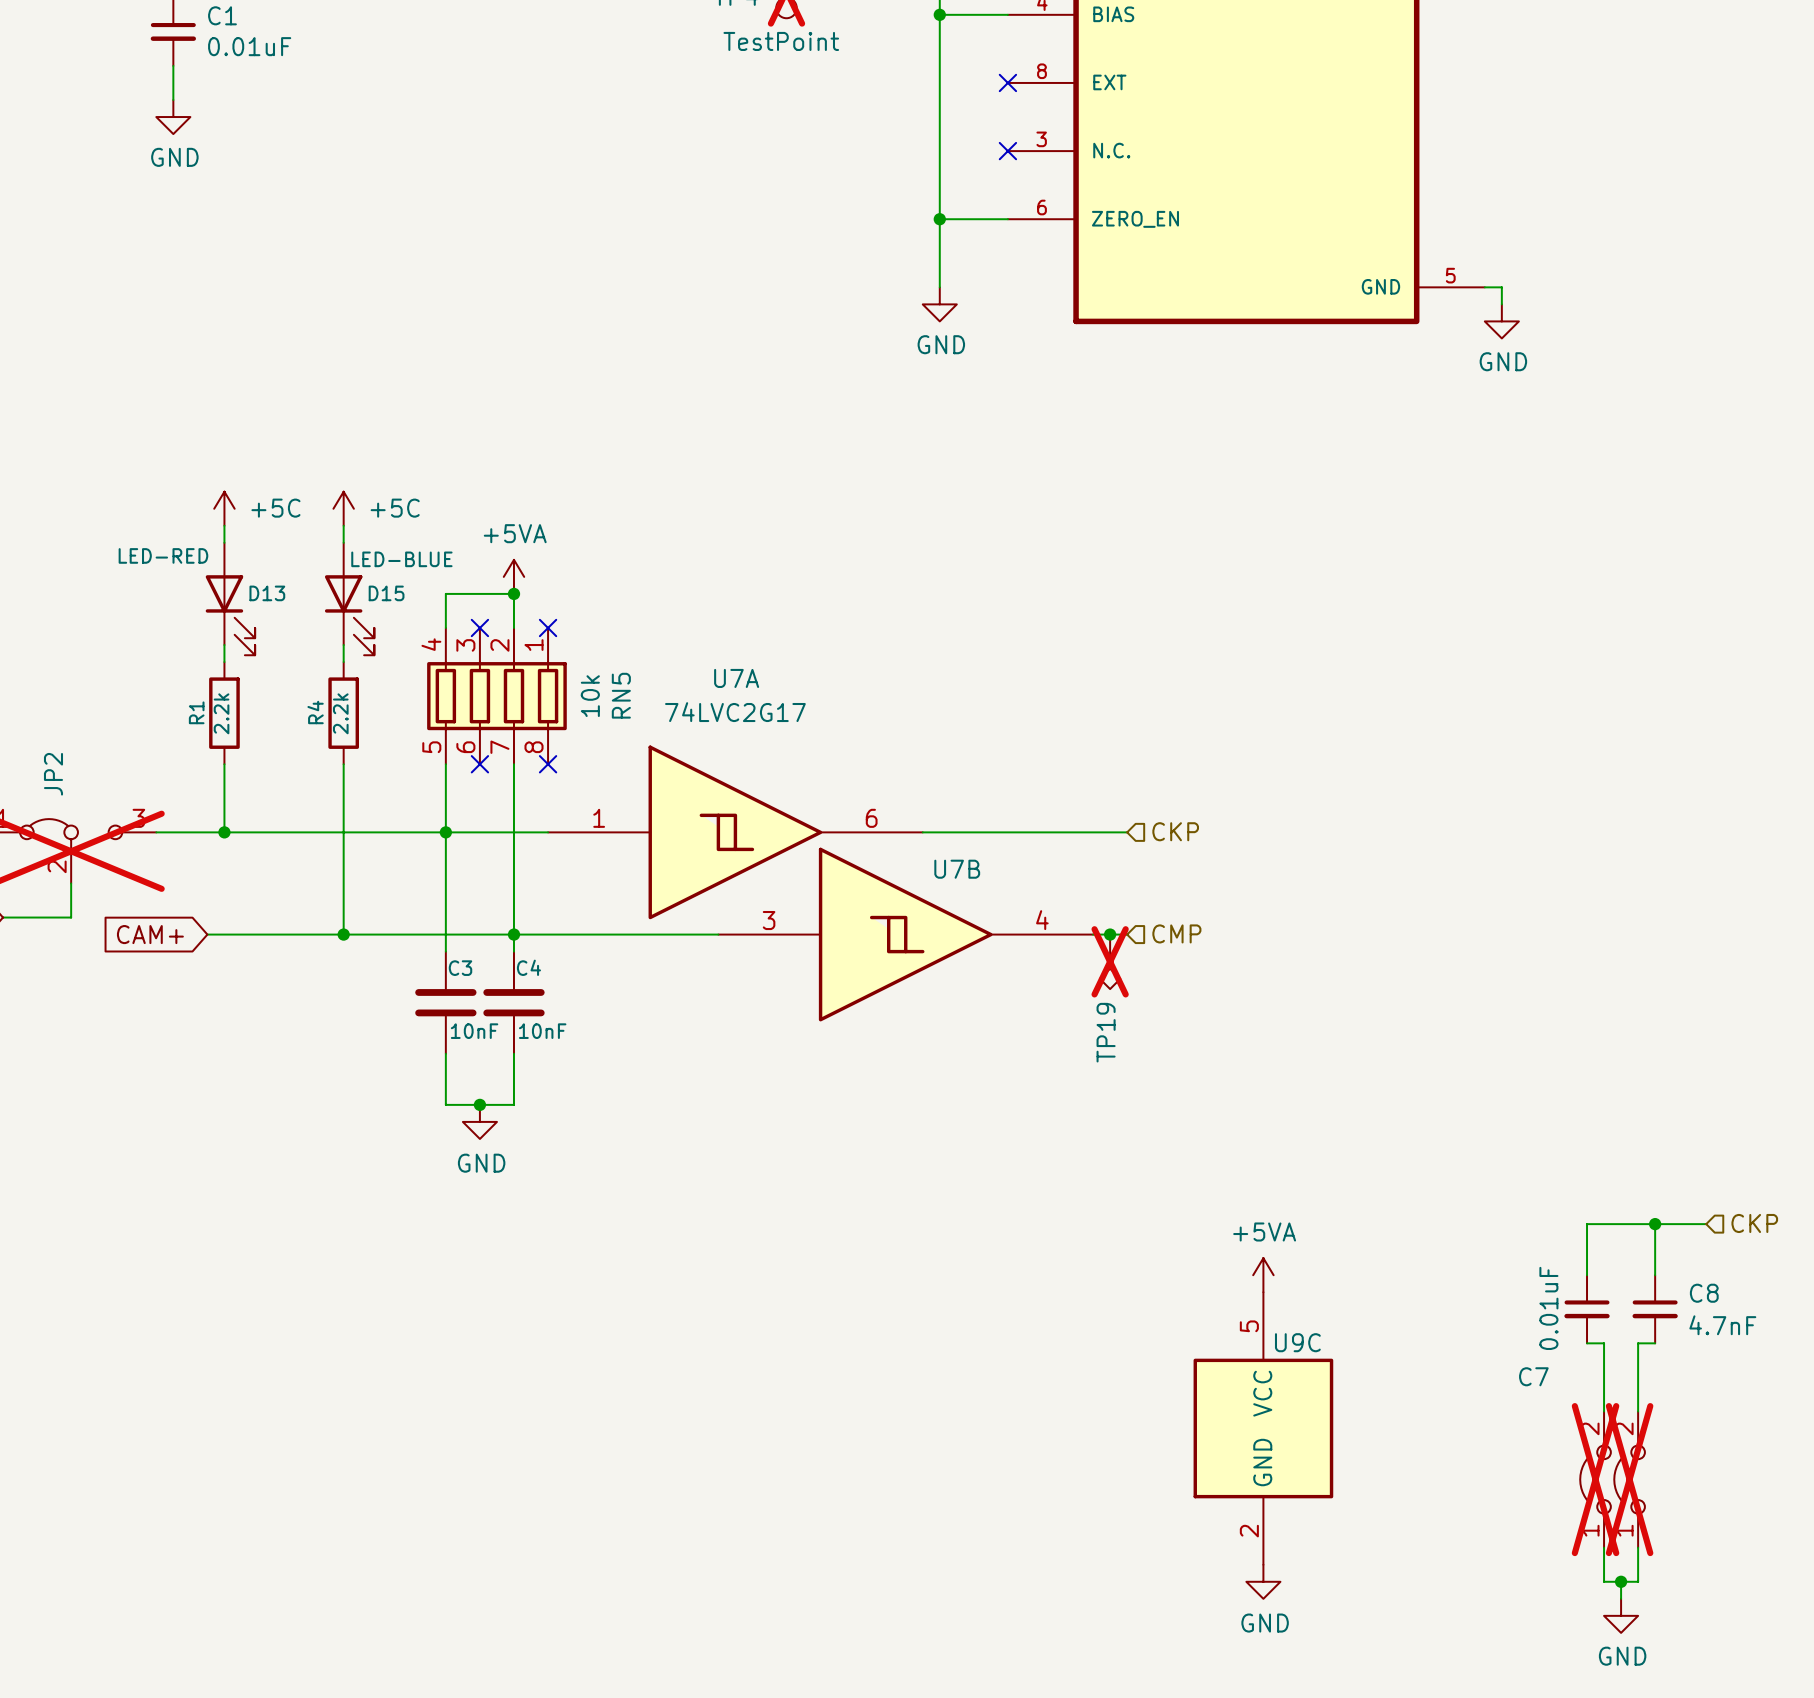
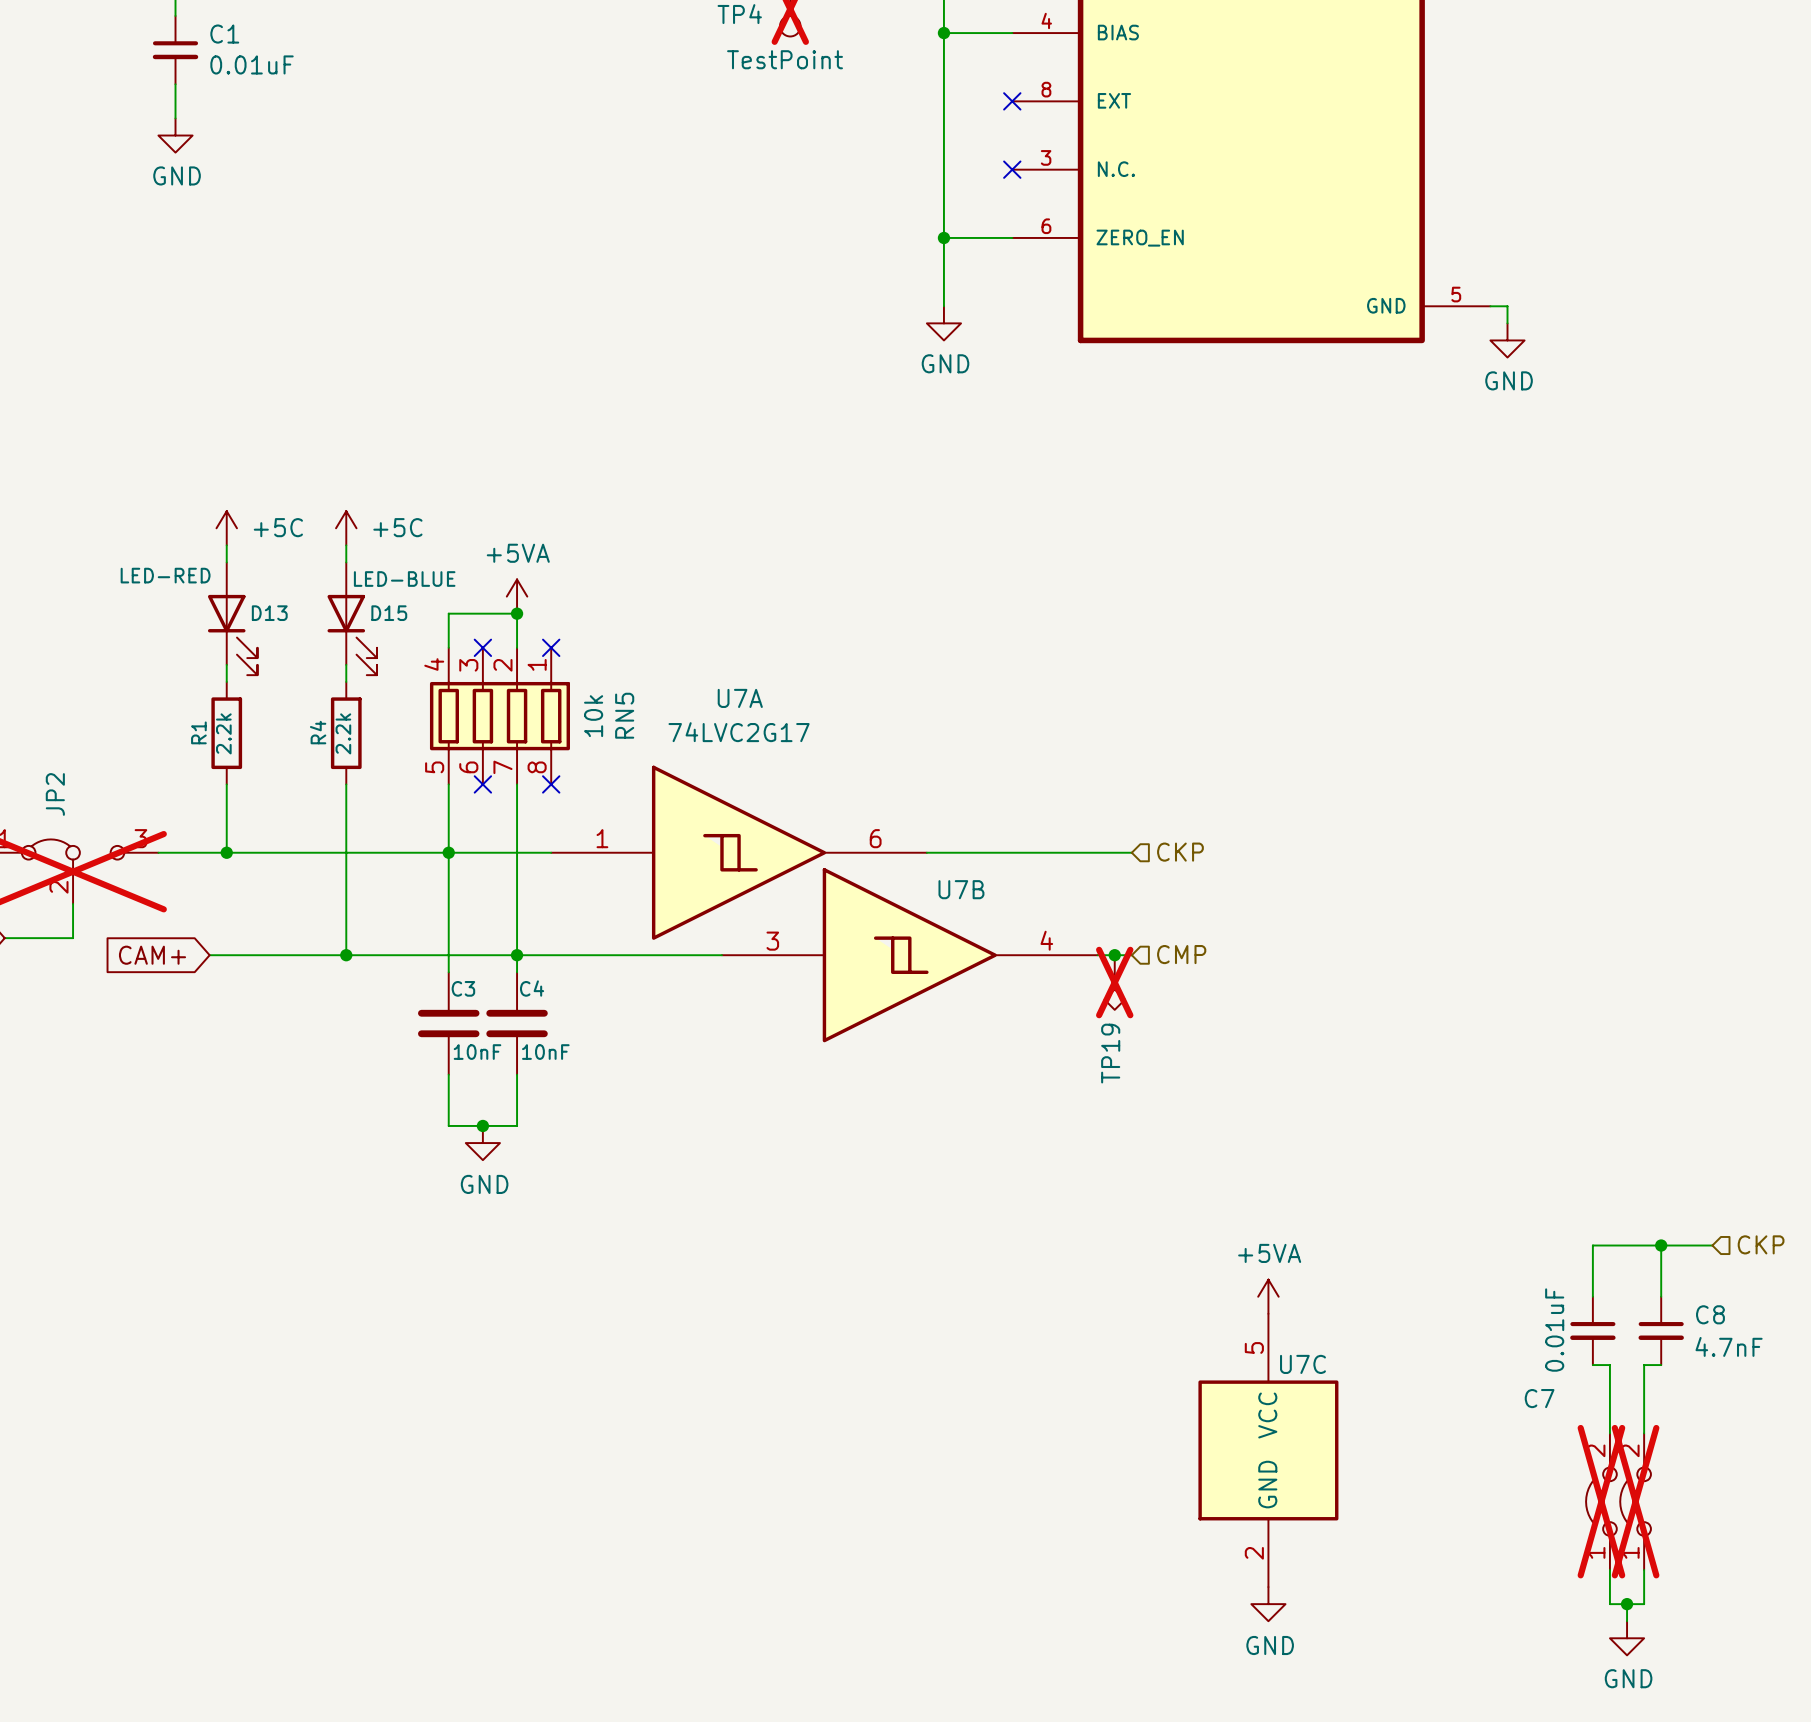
U9C name: U9C (1297, 1342) -> U7C (1302, 1364)

